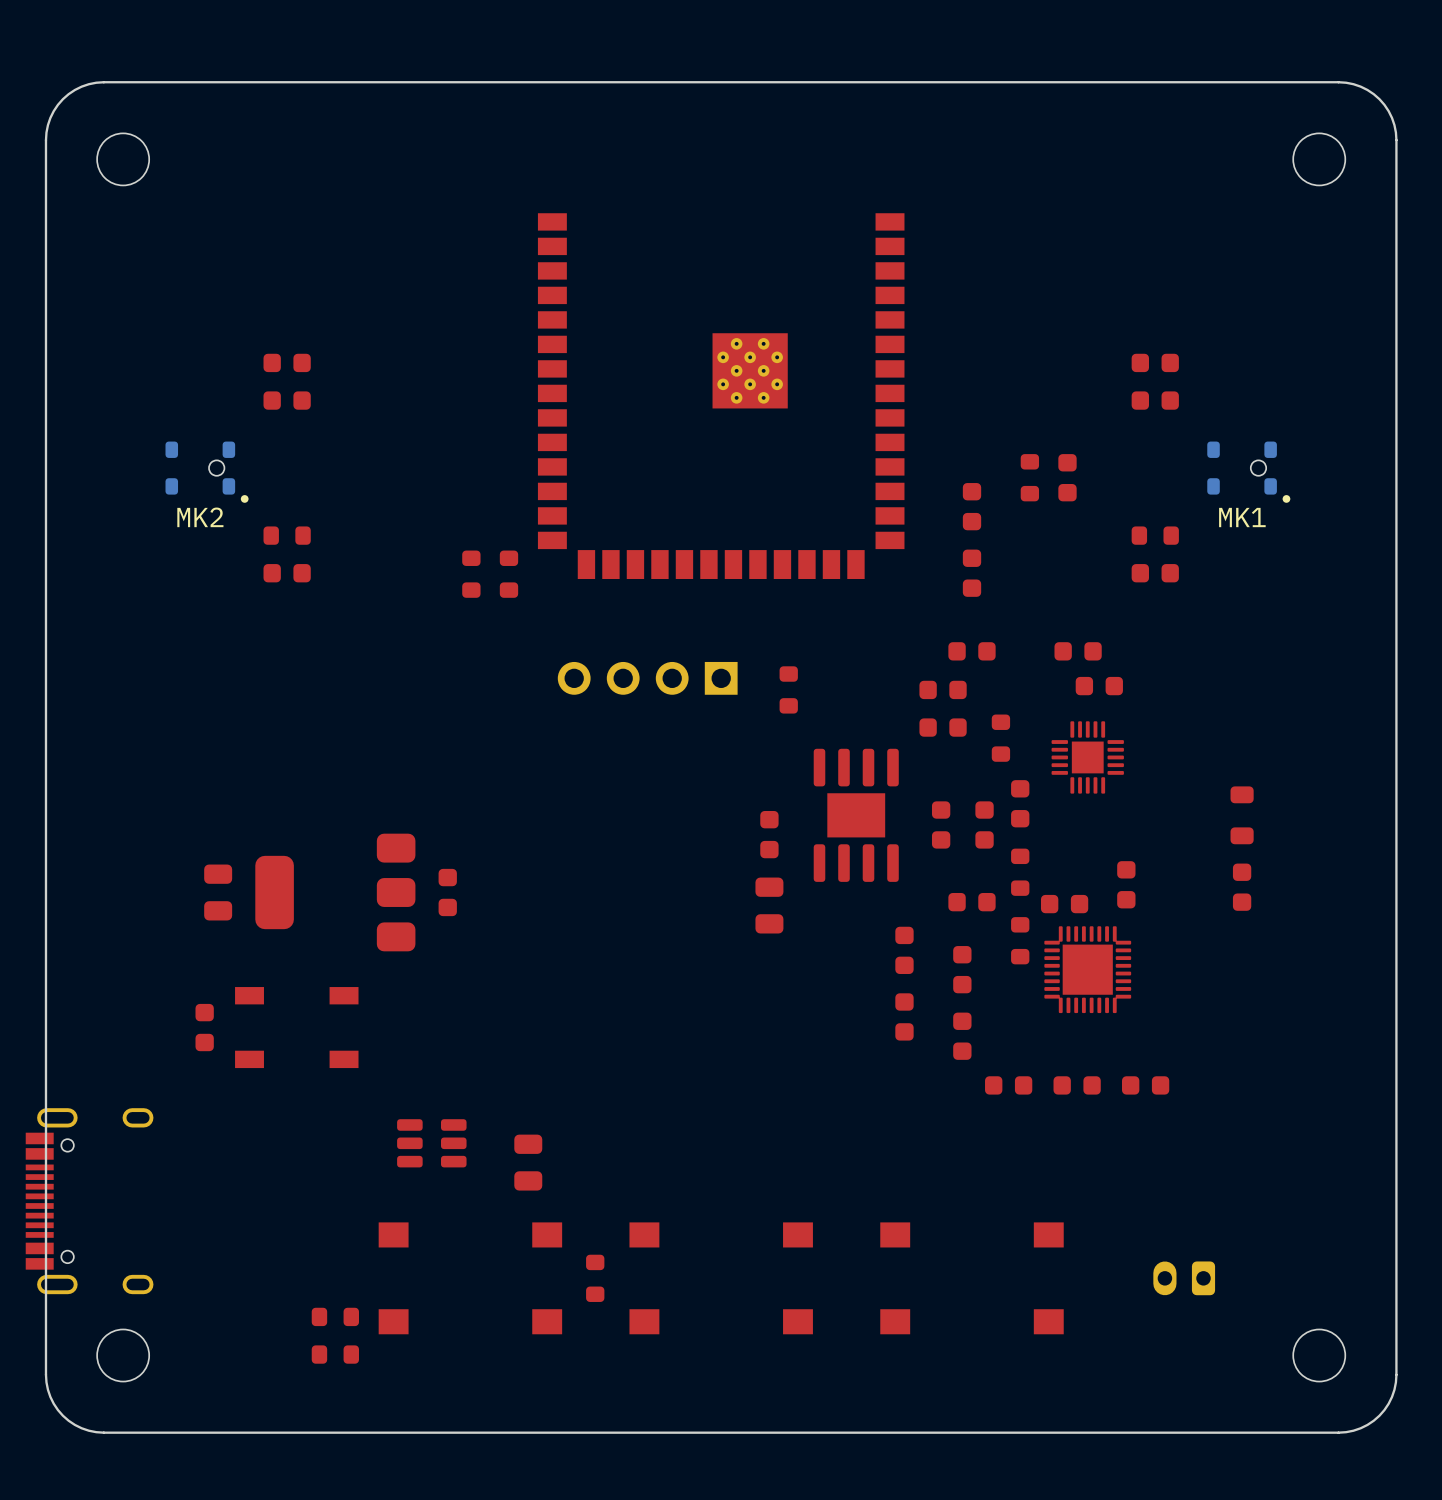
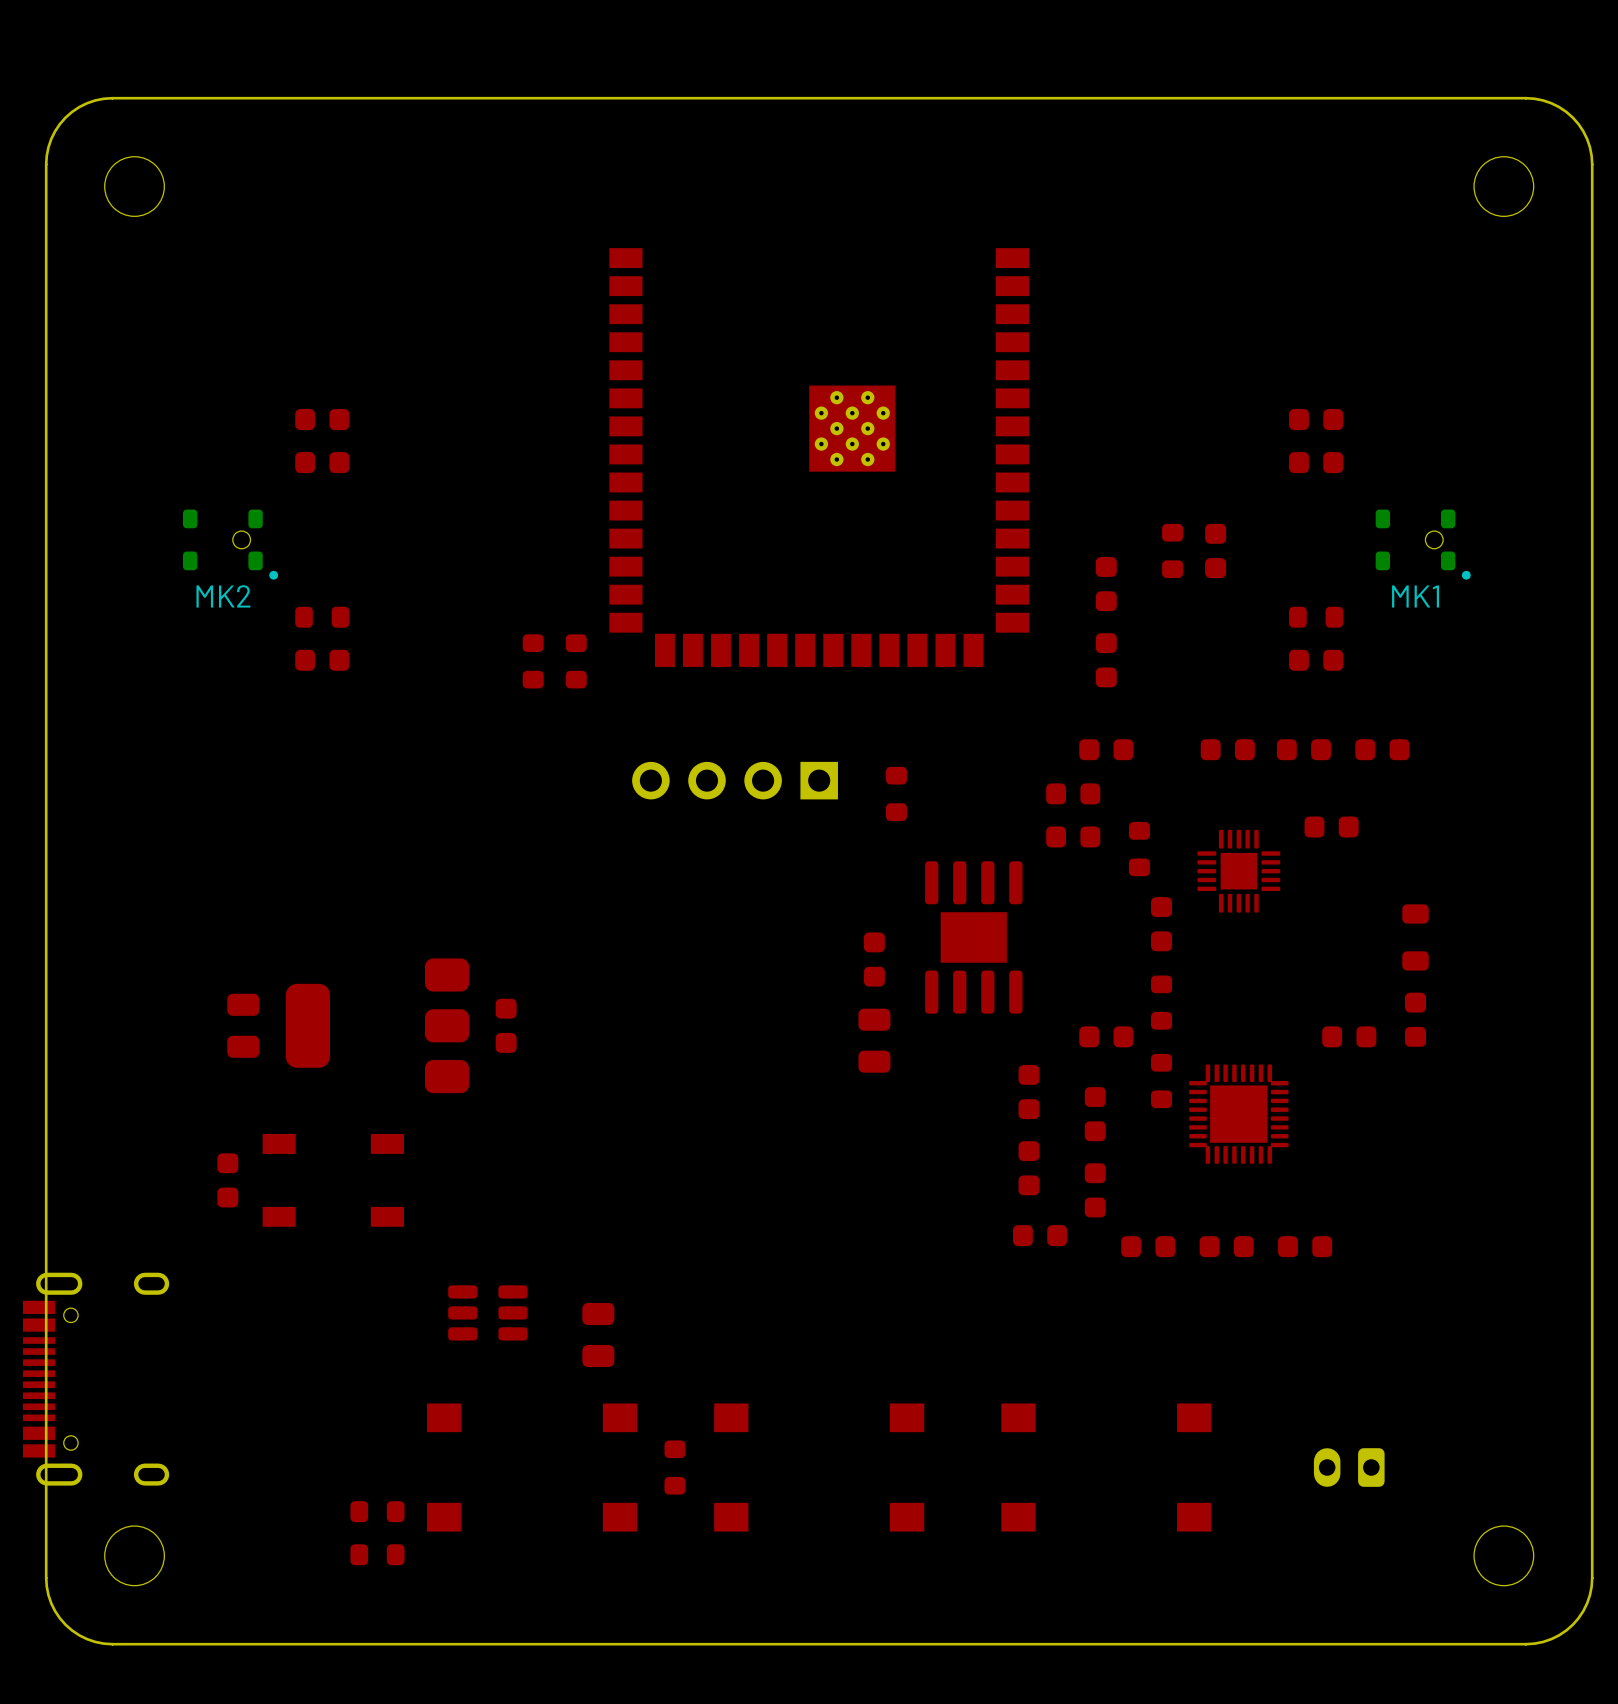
part: none -> (1303, 749)
part: none -> (1382, 749)
part: (1099, 686) -> none
part: none -> (1331, 827)
part: (941, 824) -> none
part: (984, 824) -> none
part: (1126, 884) -> none
part: none -> (1349, 1036)
part: (1064, 904) -> none
part: none -> (1040, 1235)

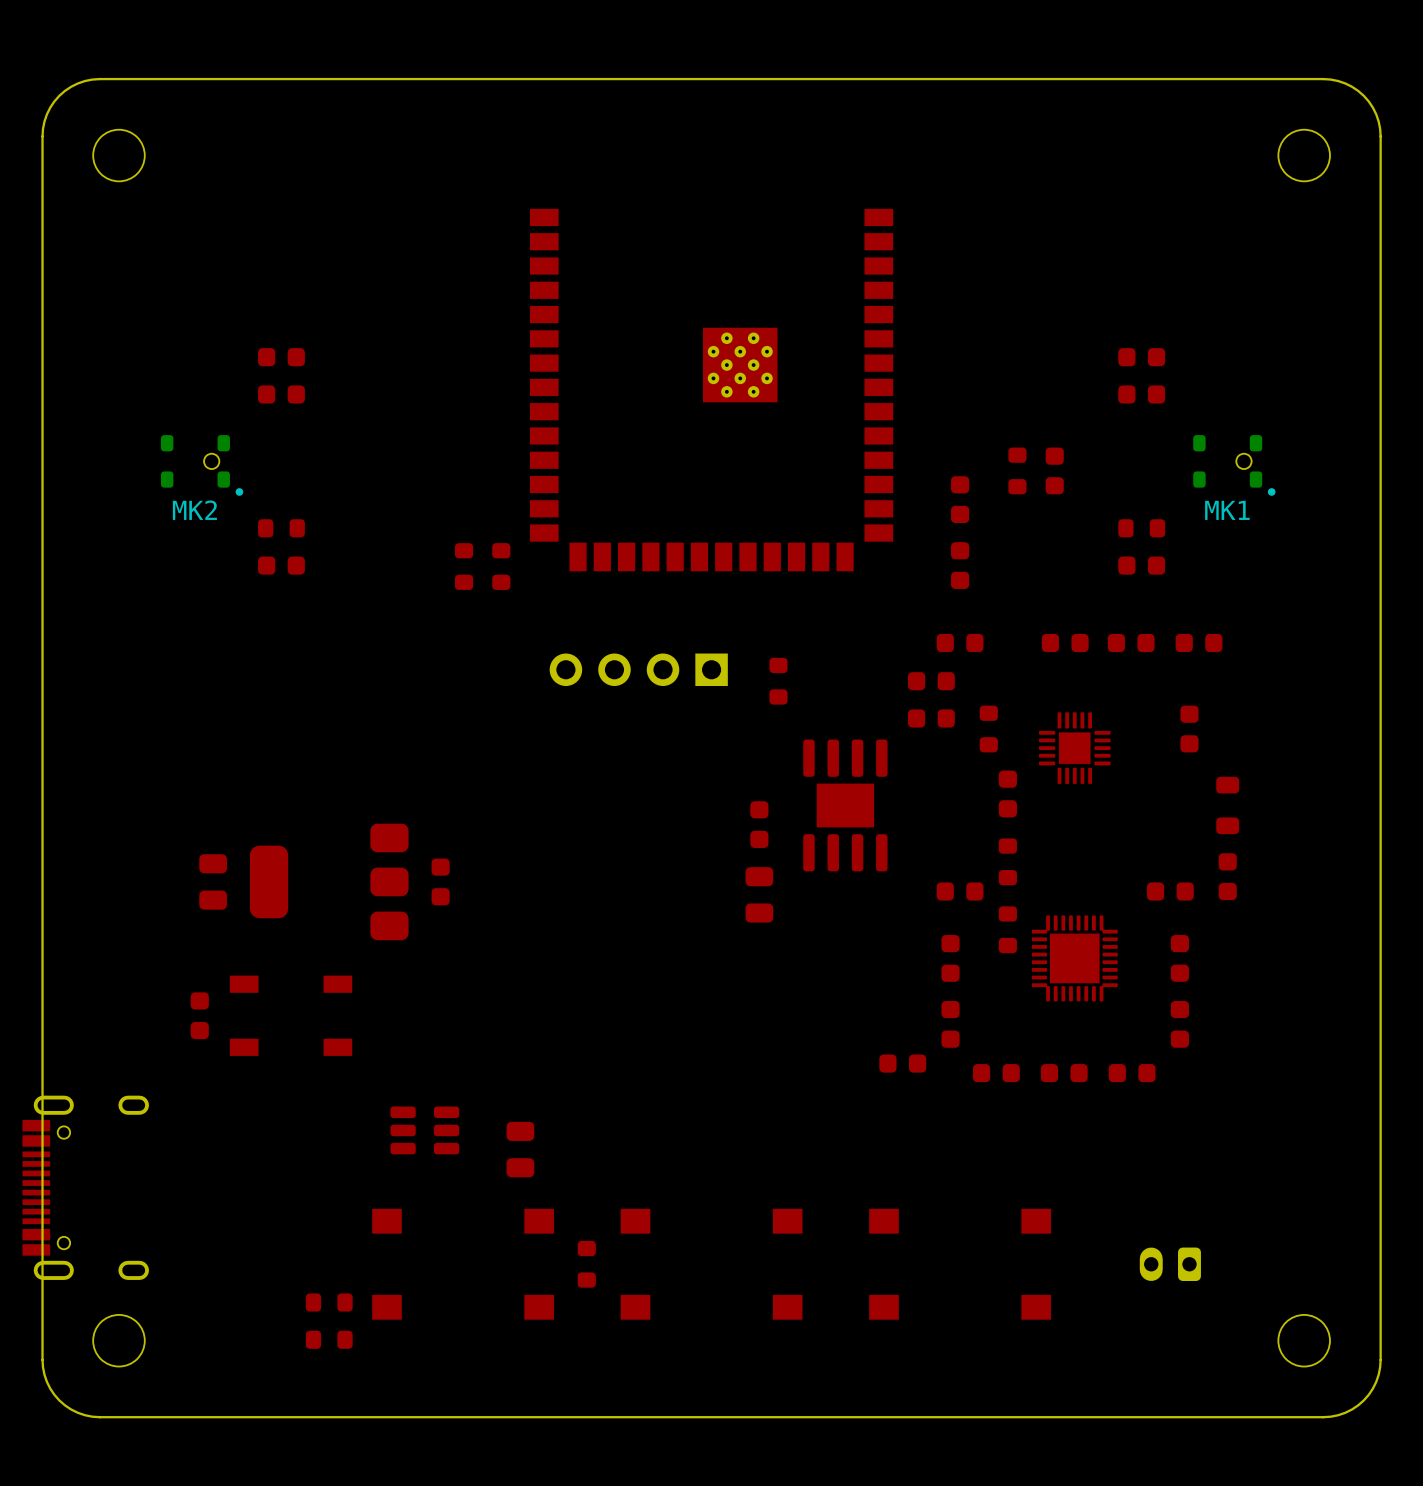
part rotation: 0° (1331, 827) -> 90° clockwise (1189, 729)
part position: (1331, 827) -> (1189, 729)
part: (1029, 1092) -> none
part: none -> (1179, 958)
part: (1029, 1168) -> none
part: none -> (1179, 1024)

